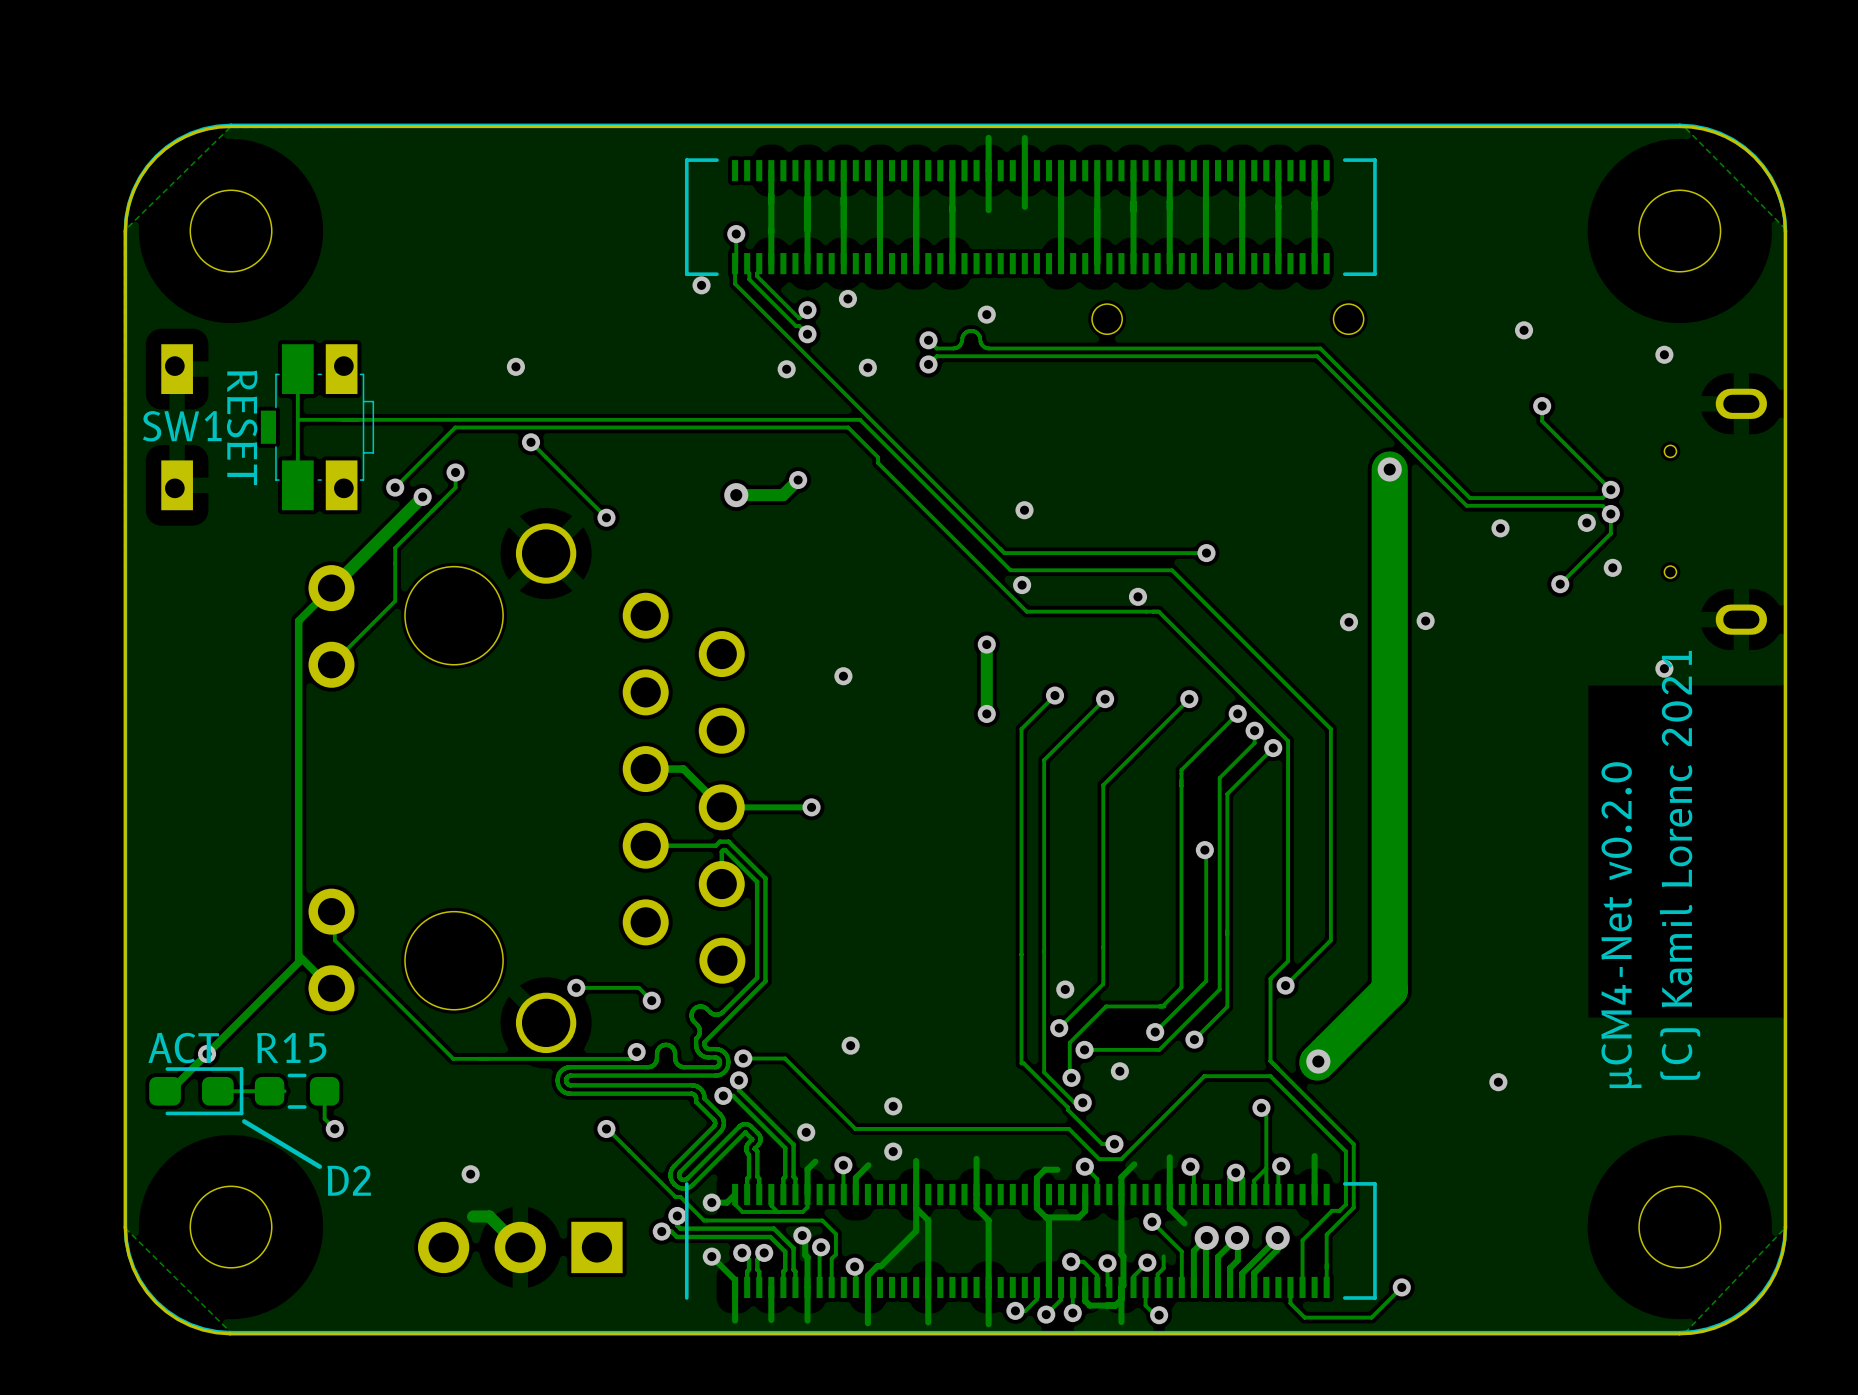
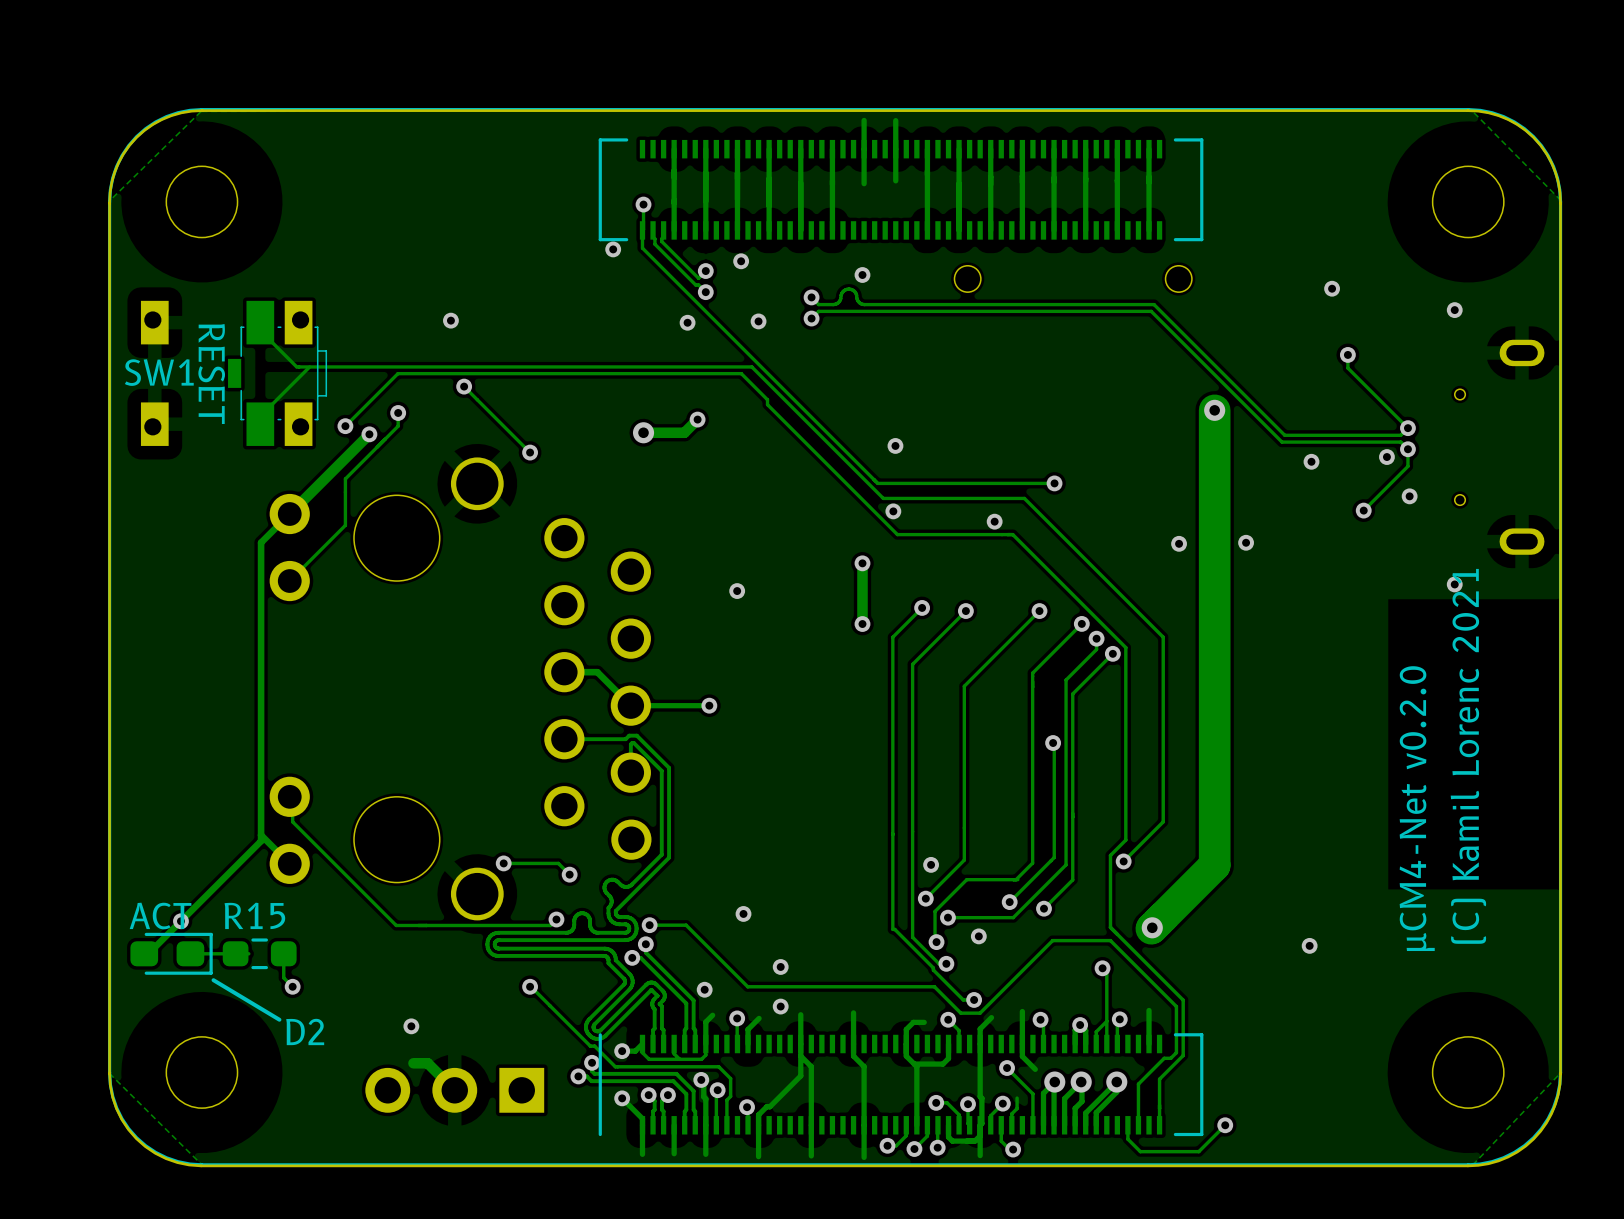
track: (297, 378) (297, 476) -> (309, 366) (260, 416)
track: (339, 419) (297, 420) -> (296, 366) (260, 330)

